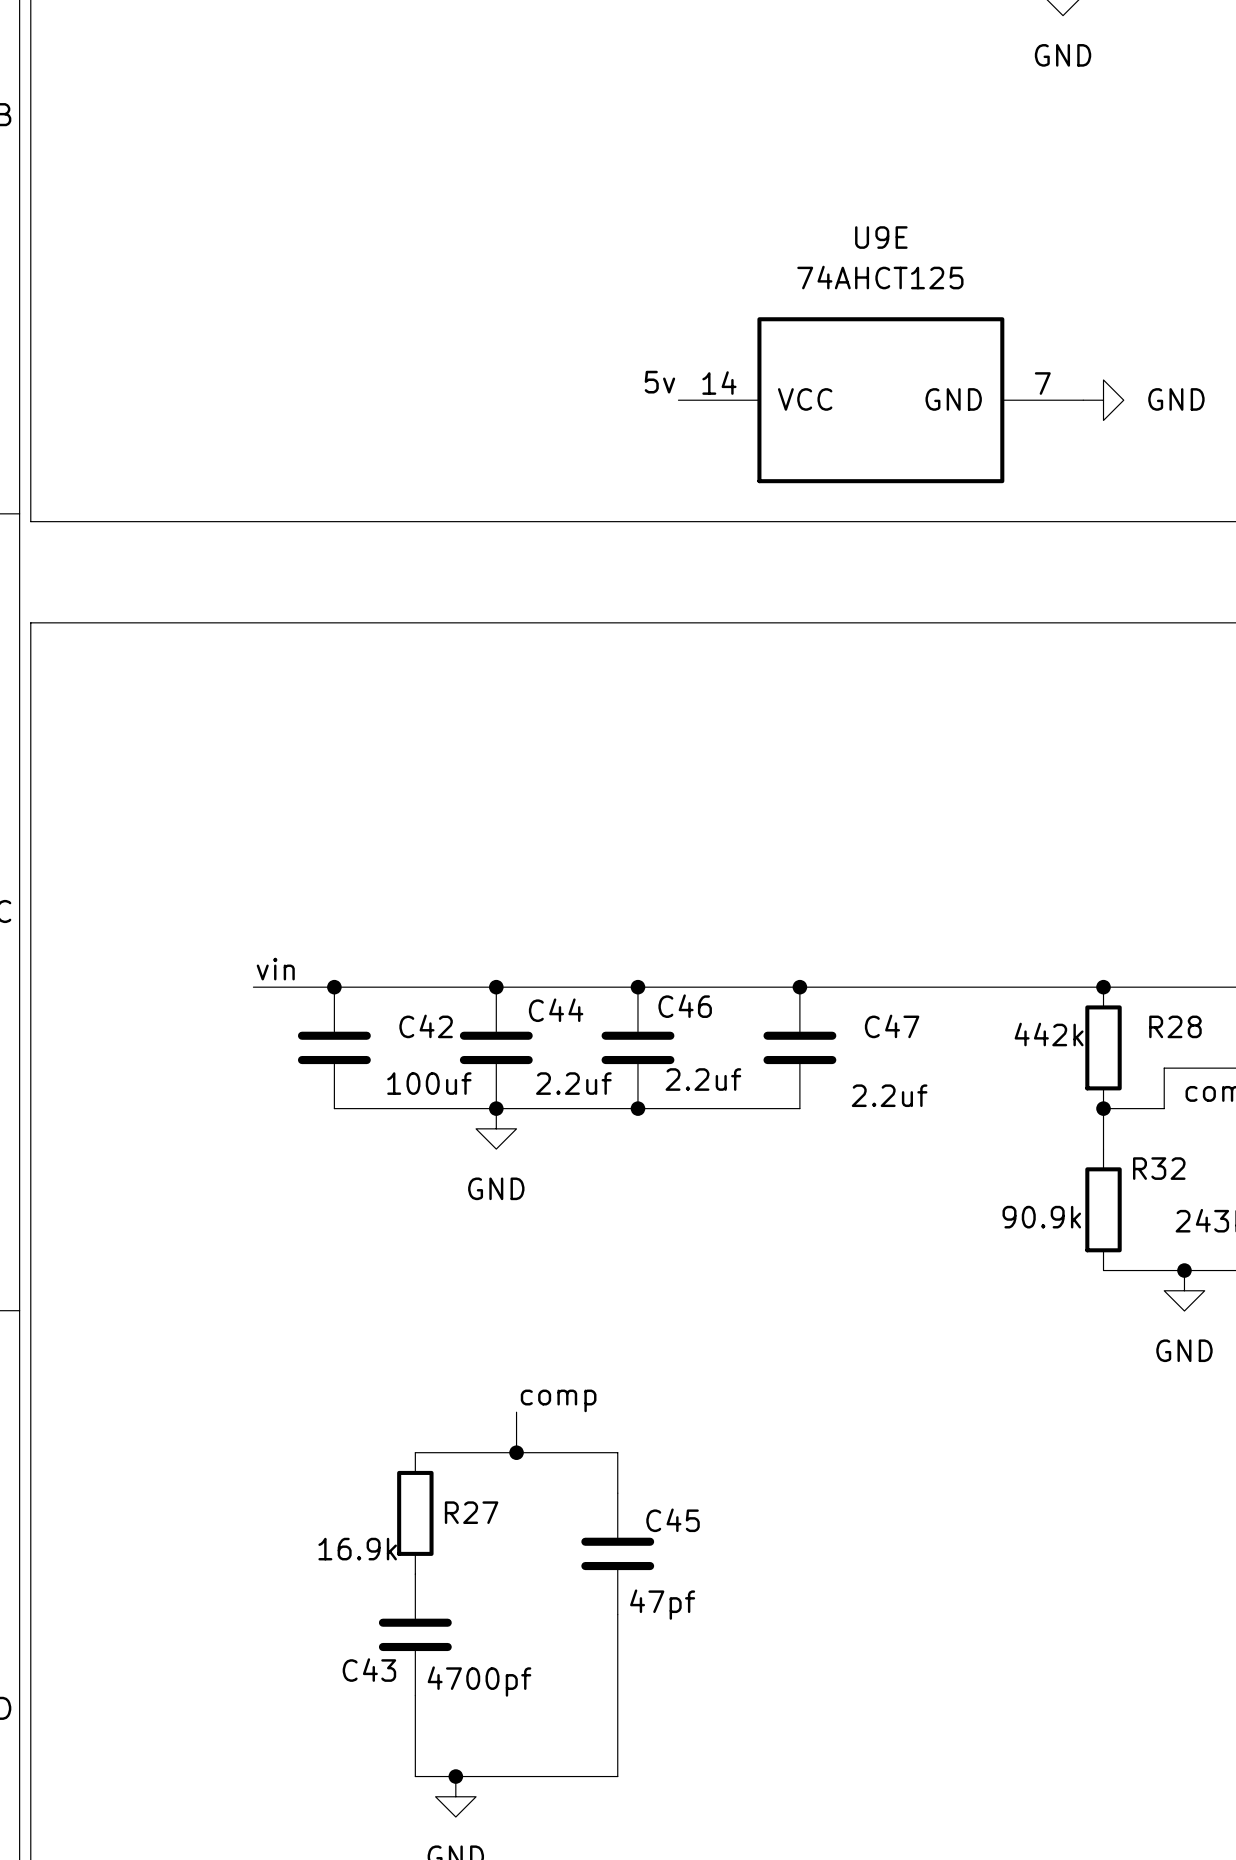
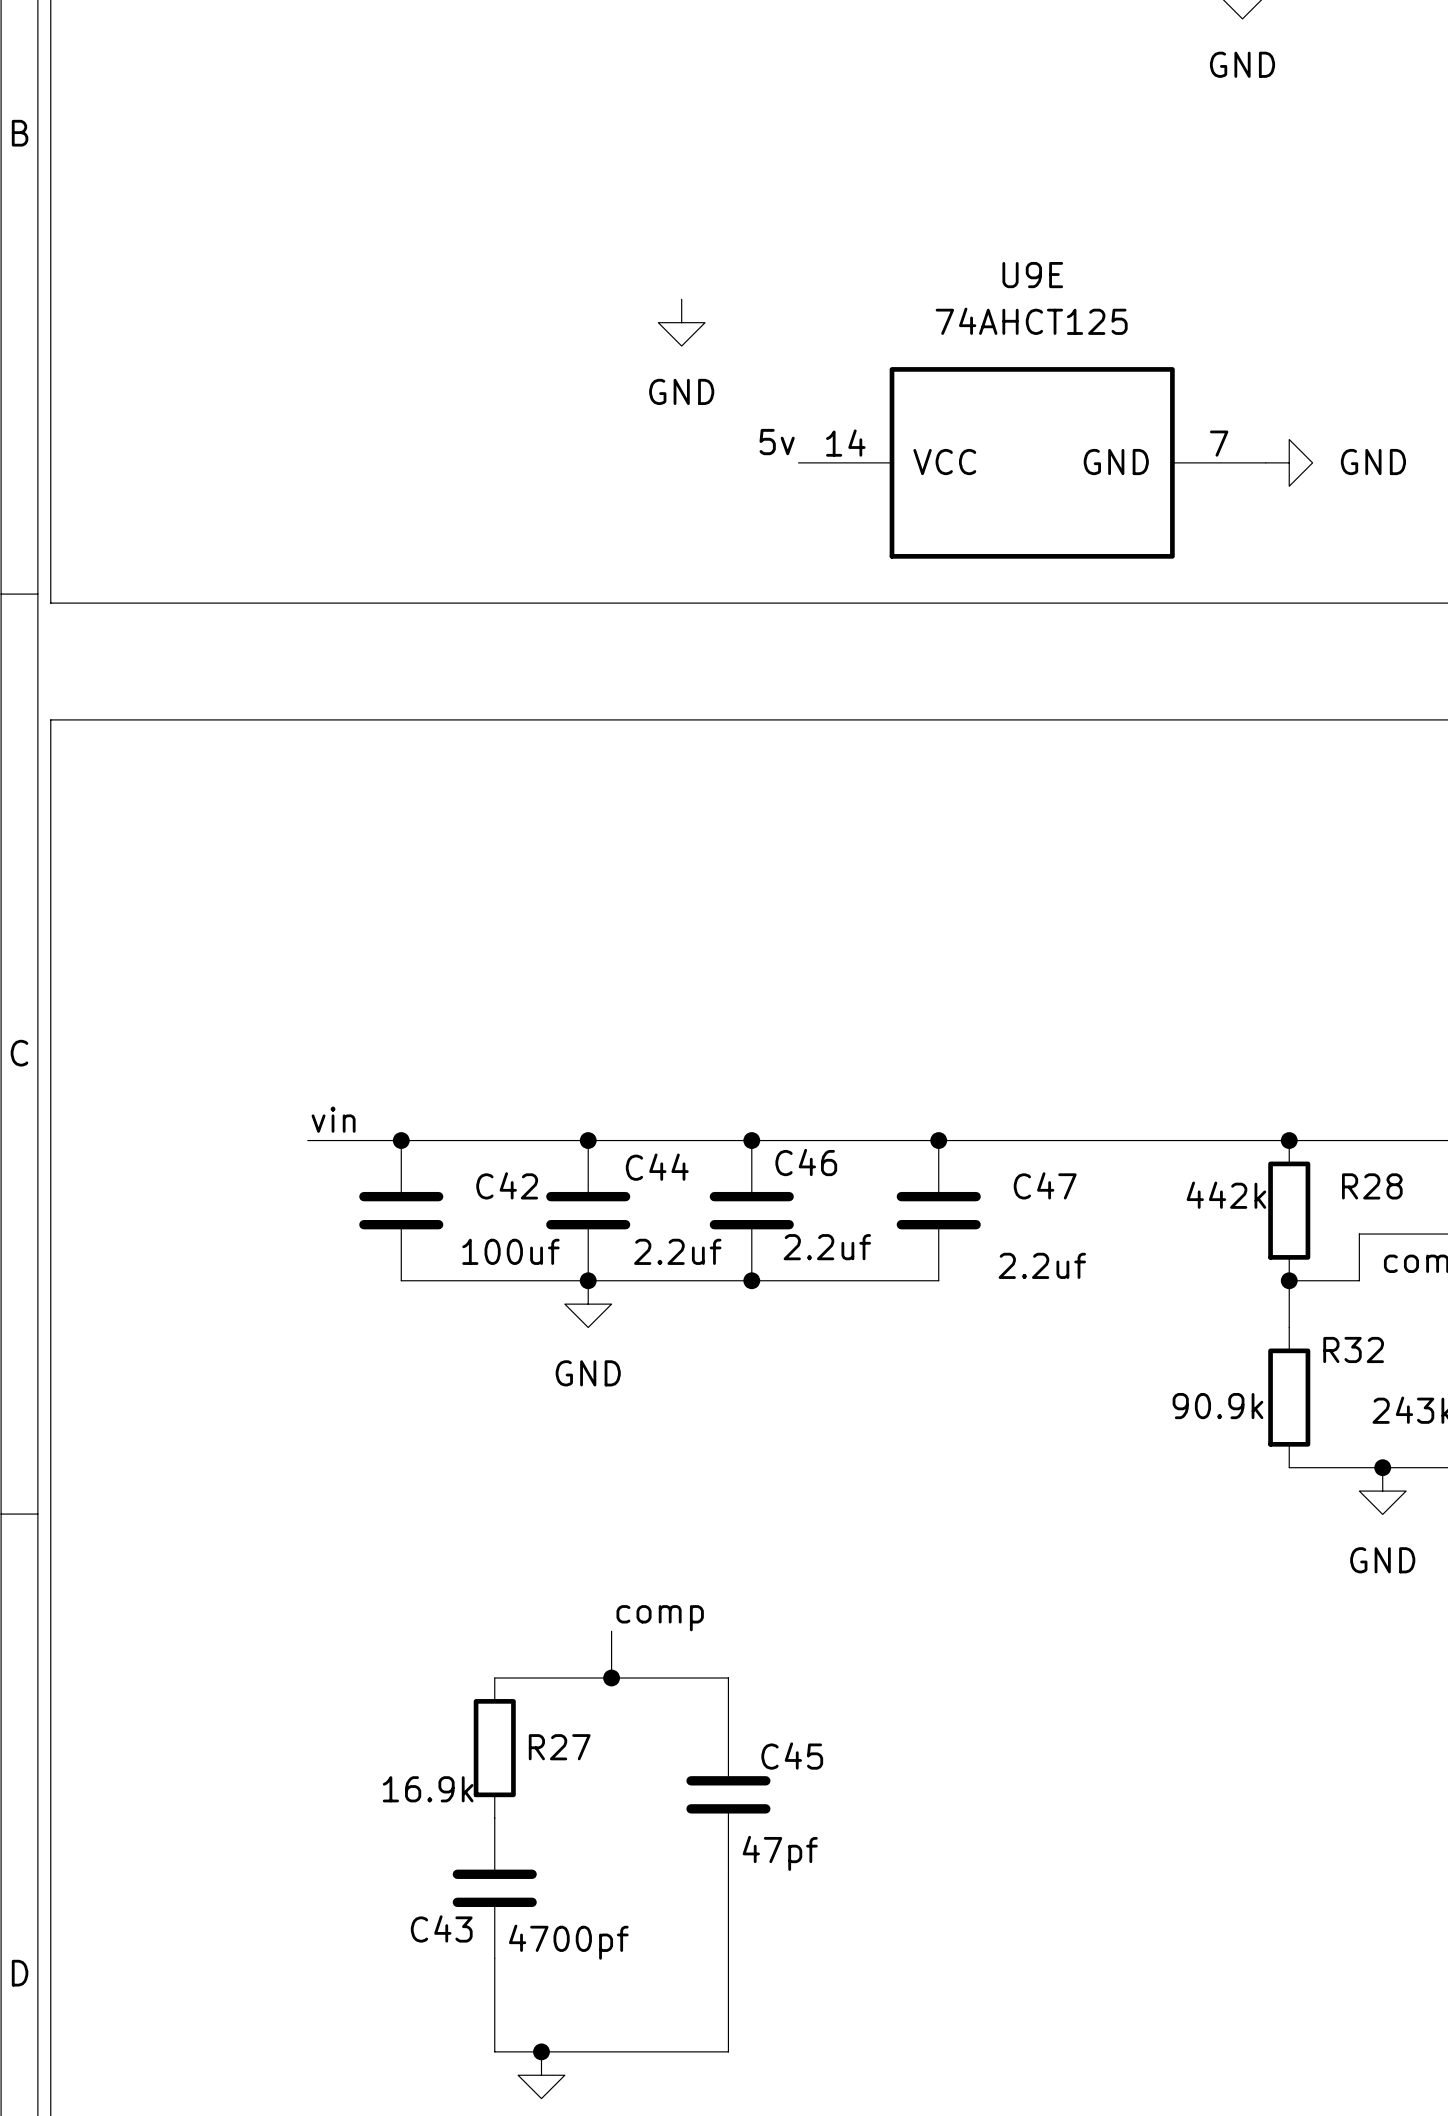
power symbol: none -> GND (681, 322)

